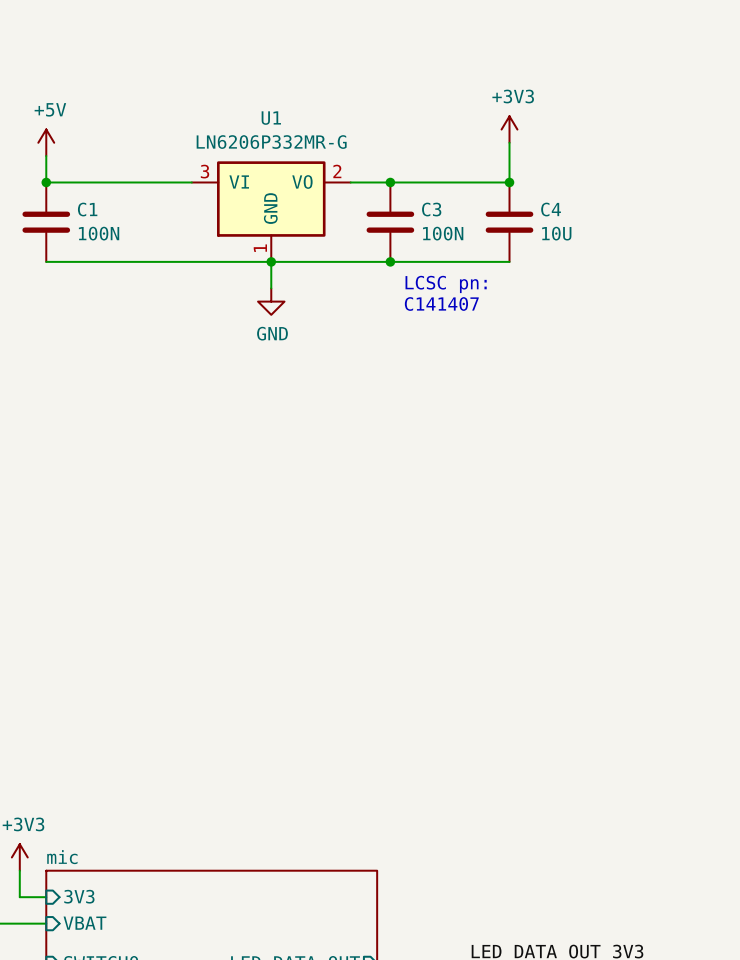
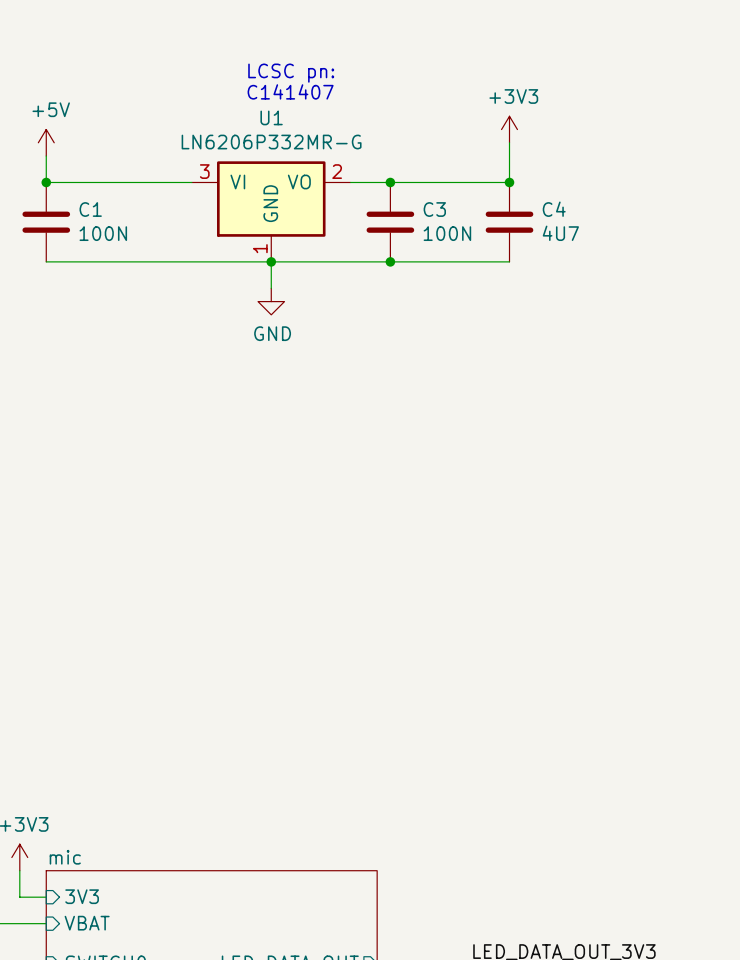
text: none -> LCSC pn: (291, 73)
text: none -> C141407 (290, 91)
C4 value: 10U (556, 233) -> 4U7 (560, 233)
text: LCSC pn: (446, 284) -> none
text: C141407 (441, 304) -> none

